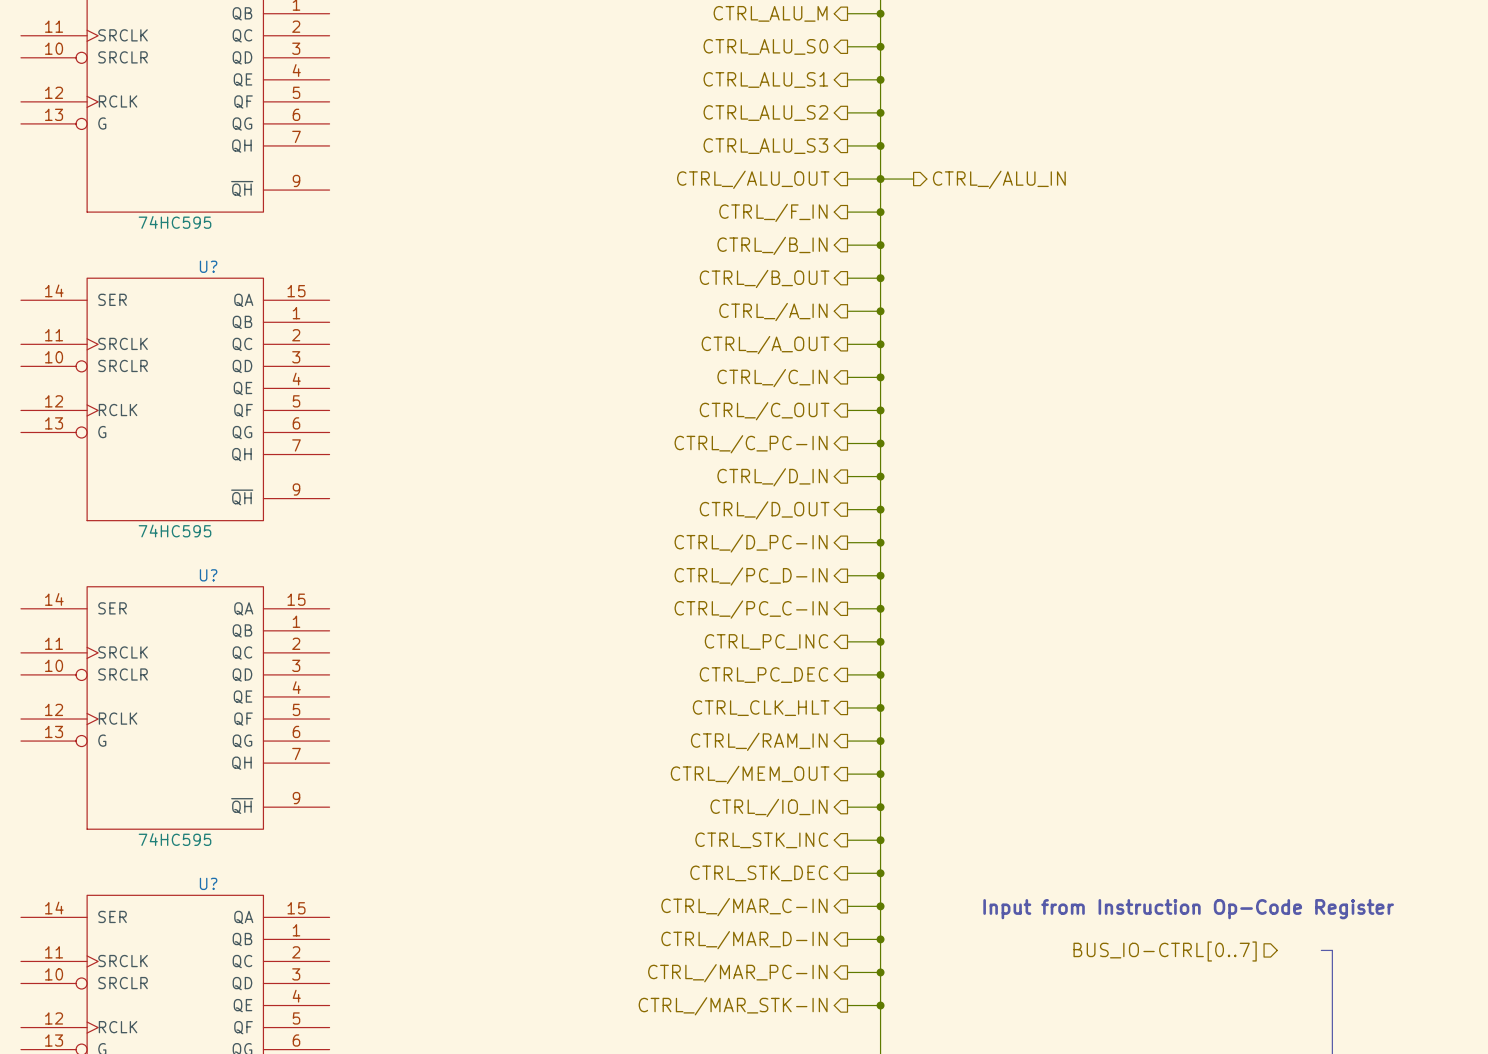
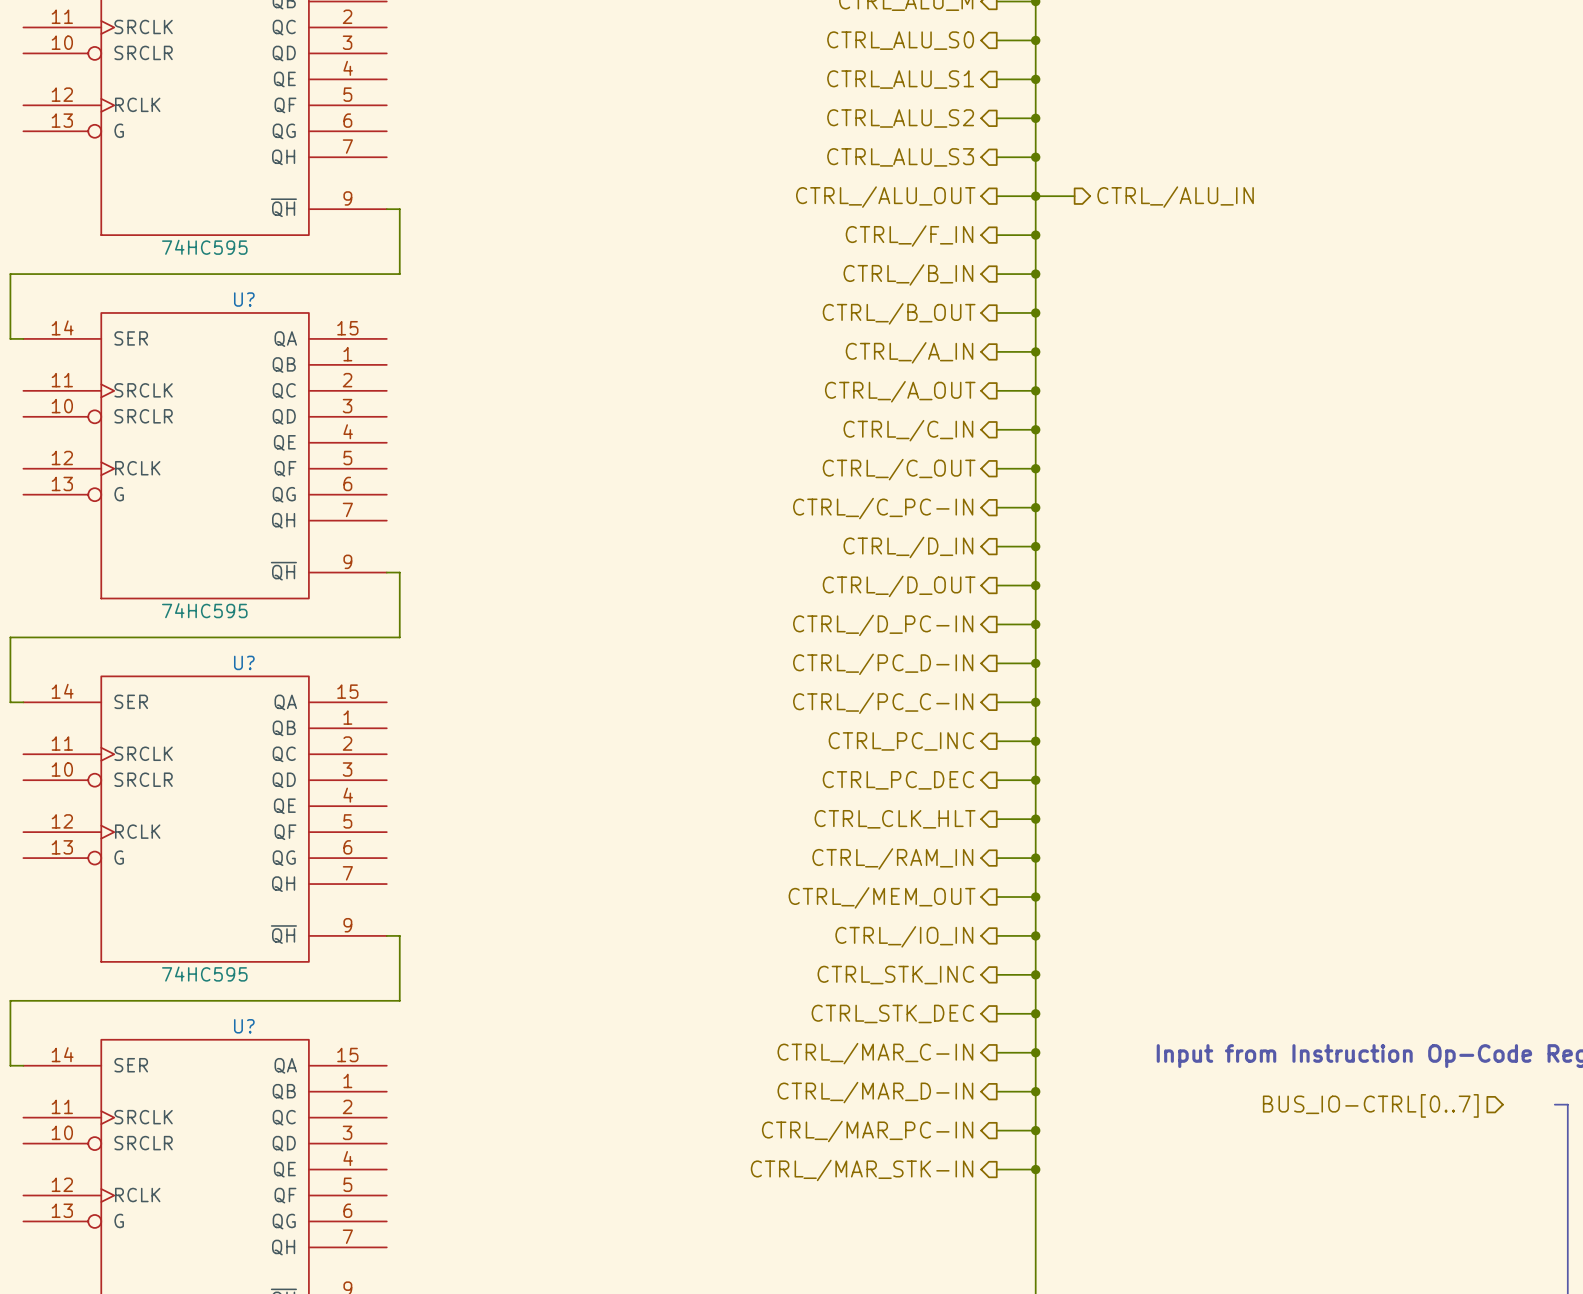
wire: none -> (386, 209) (399, 209) (399, 274) (10, 274) (10, 338) (23, 338)
wire: none -> (386, 572) (399, 572) (399, 637) (10, 637) (10, 702) (23, 702)
wire: none -> (386, 935) (399, 935) (399, 1000) (10, 1000) (10, 1065) (23, 1065)

